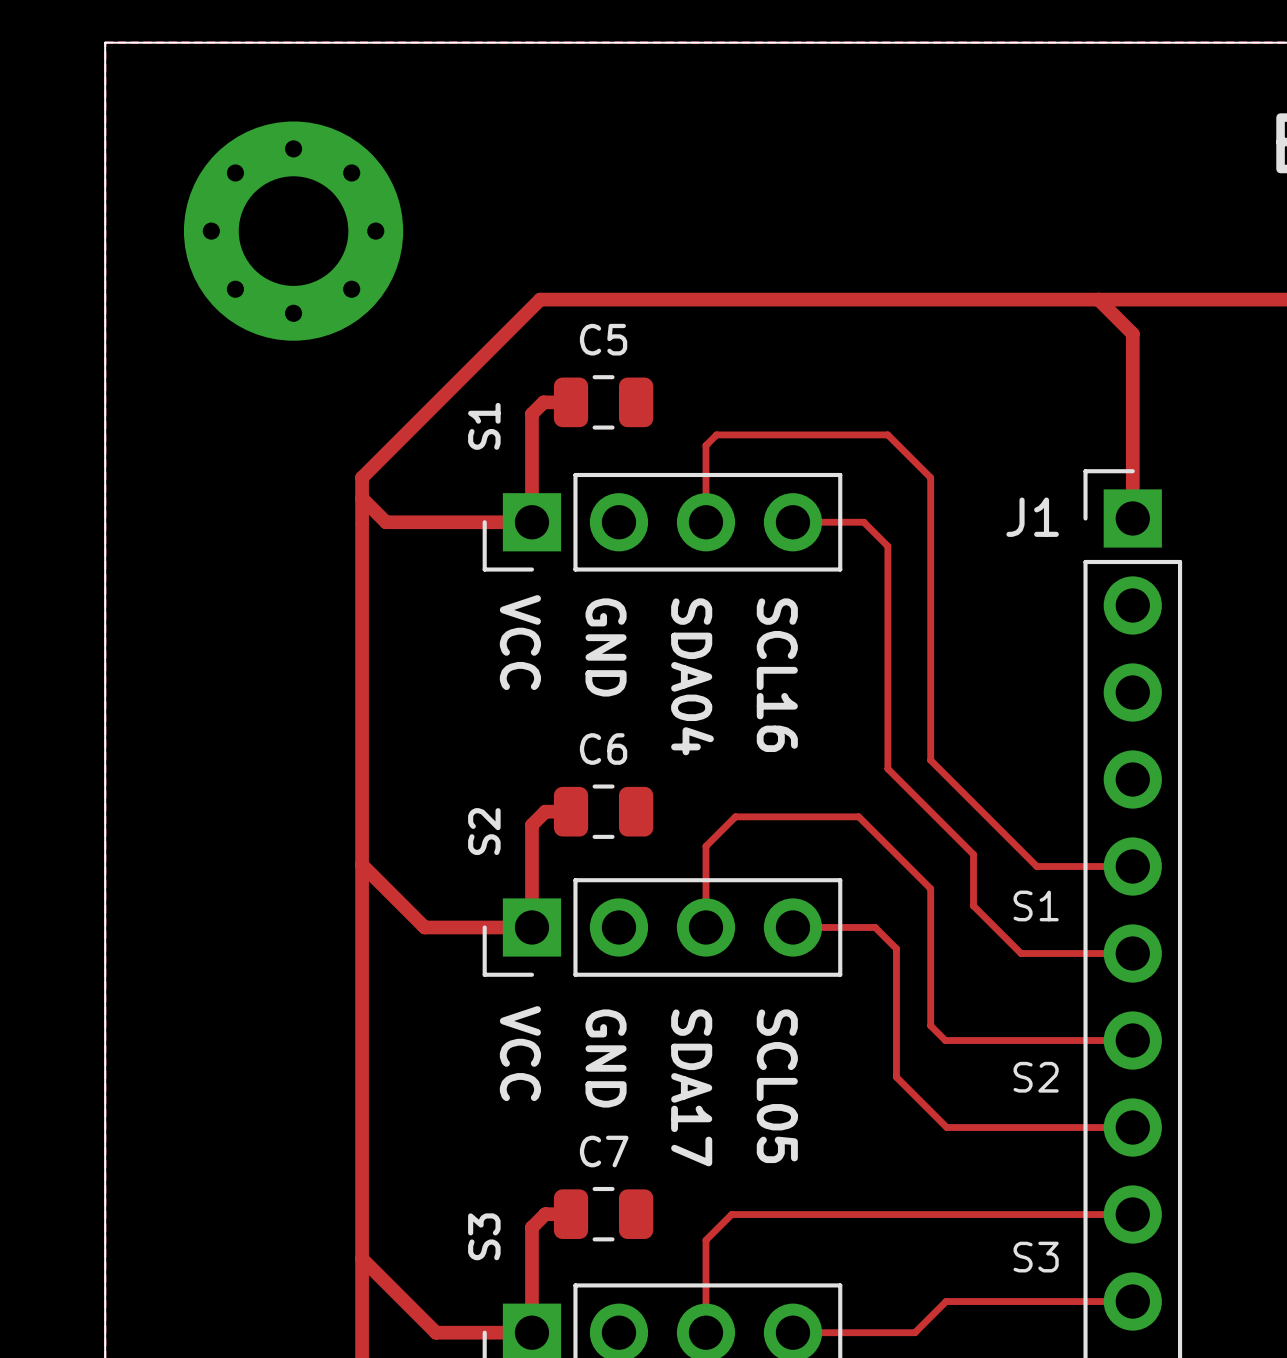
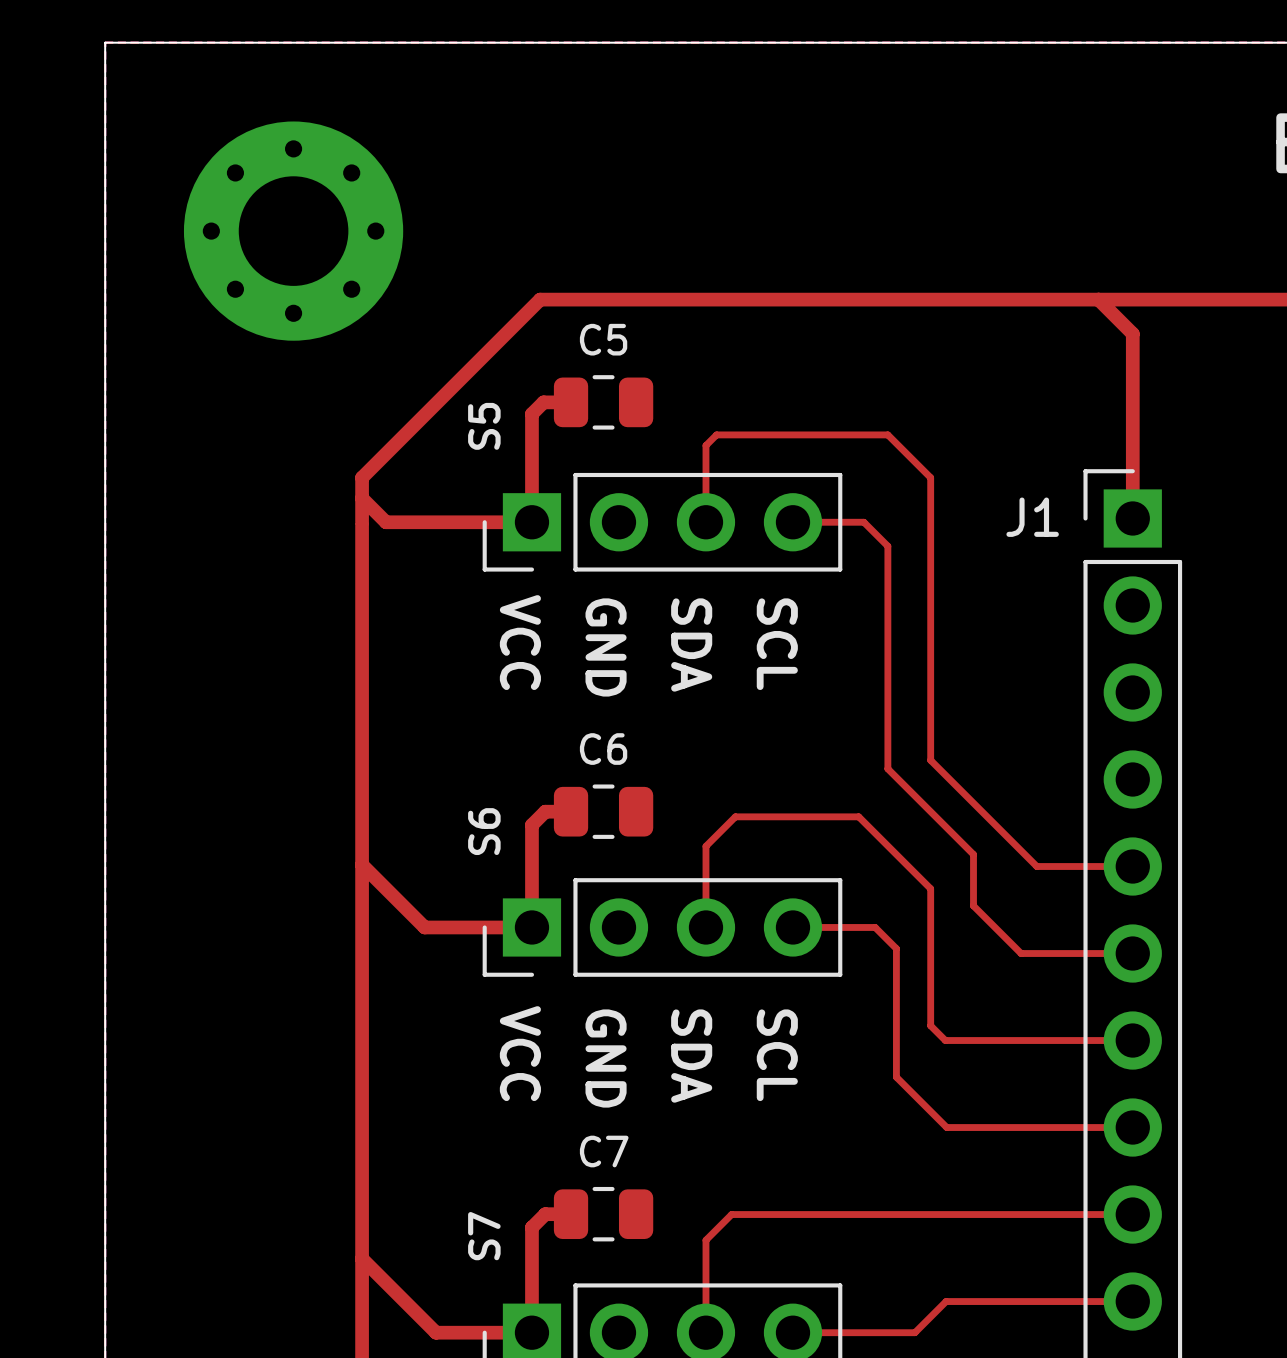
S1 name: S1 (484, 426) -> S5 (484, 426)
text: SCL16 (777, 675) -> SCL (777, 644)
text: SDA04 (692, 676) -> SDA (691, 645)
S2 name: S2 (484, 831) -> S6 (484, 831)
text: S1 (1036, 905) -> none
text: S2 (1036, 1077) -> none
text: SCL05 (777, 1086) -> SCL (777, 1055)
text: SDA17 (691, 1087) -> SDA (691, 1056)
S3 name: S3 (484, 1236) -> S7 (484, 1236)
text: S3 (1036, 1257) -> none

